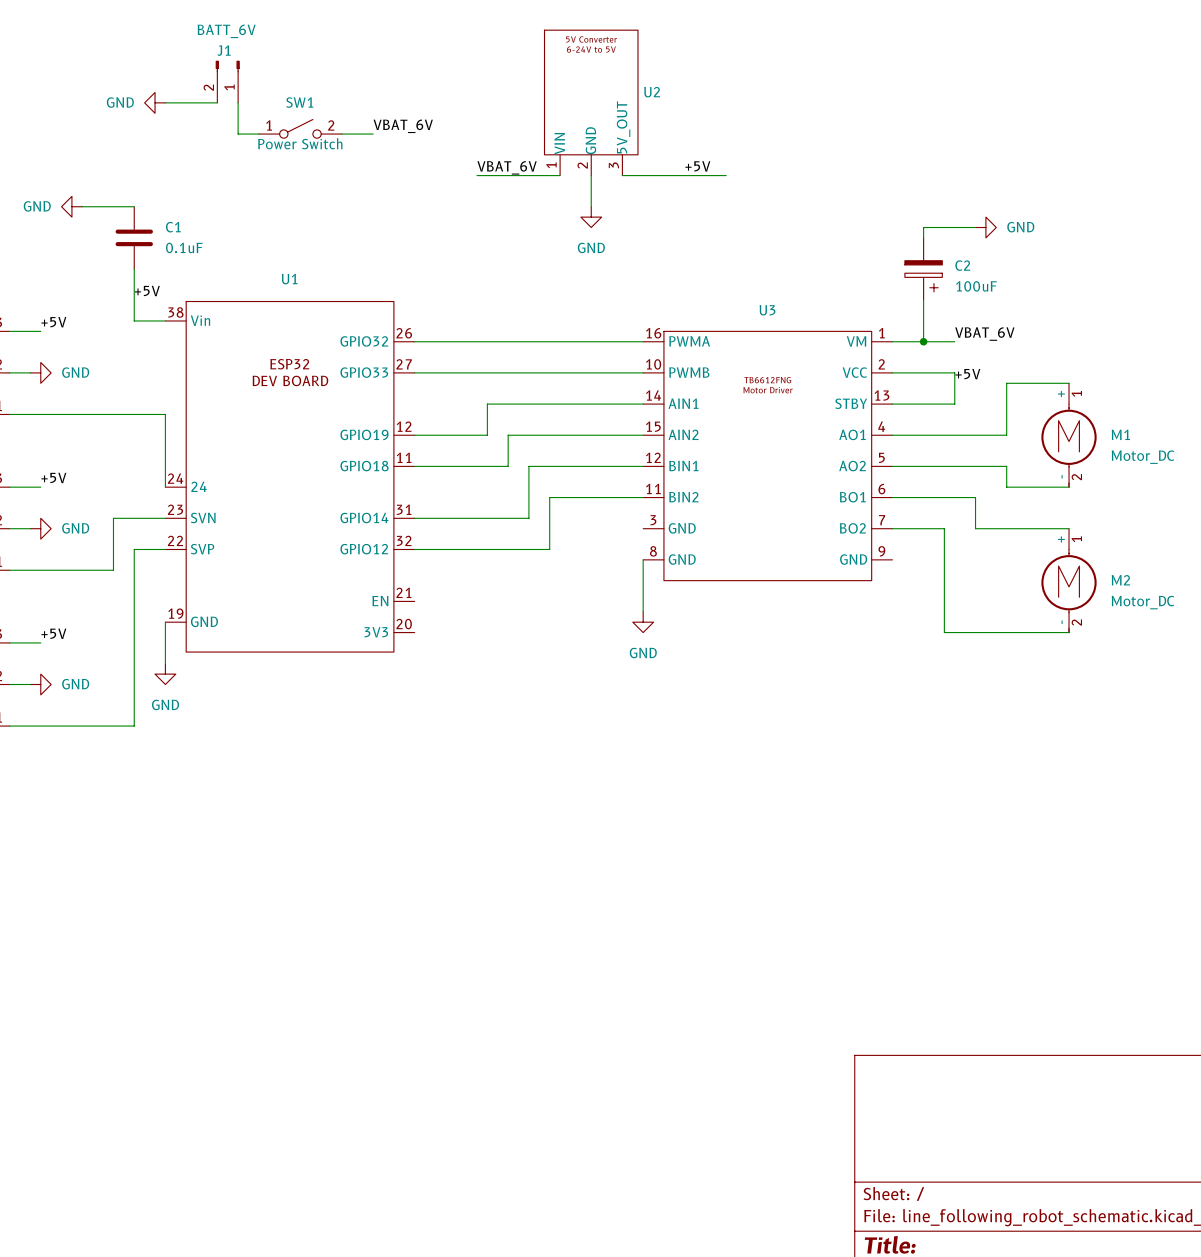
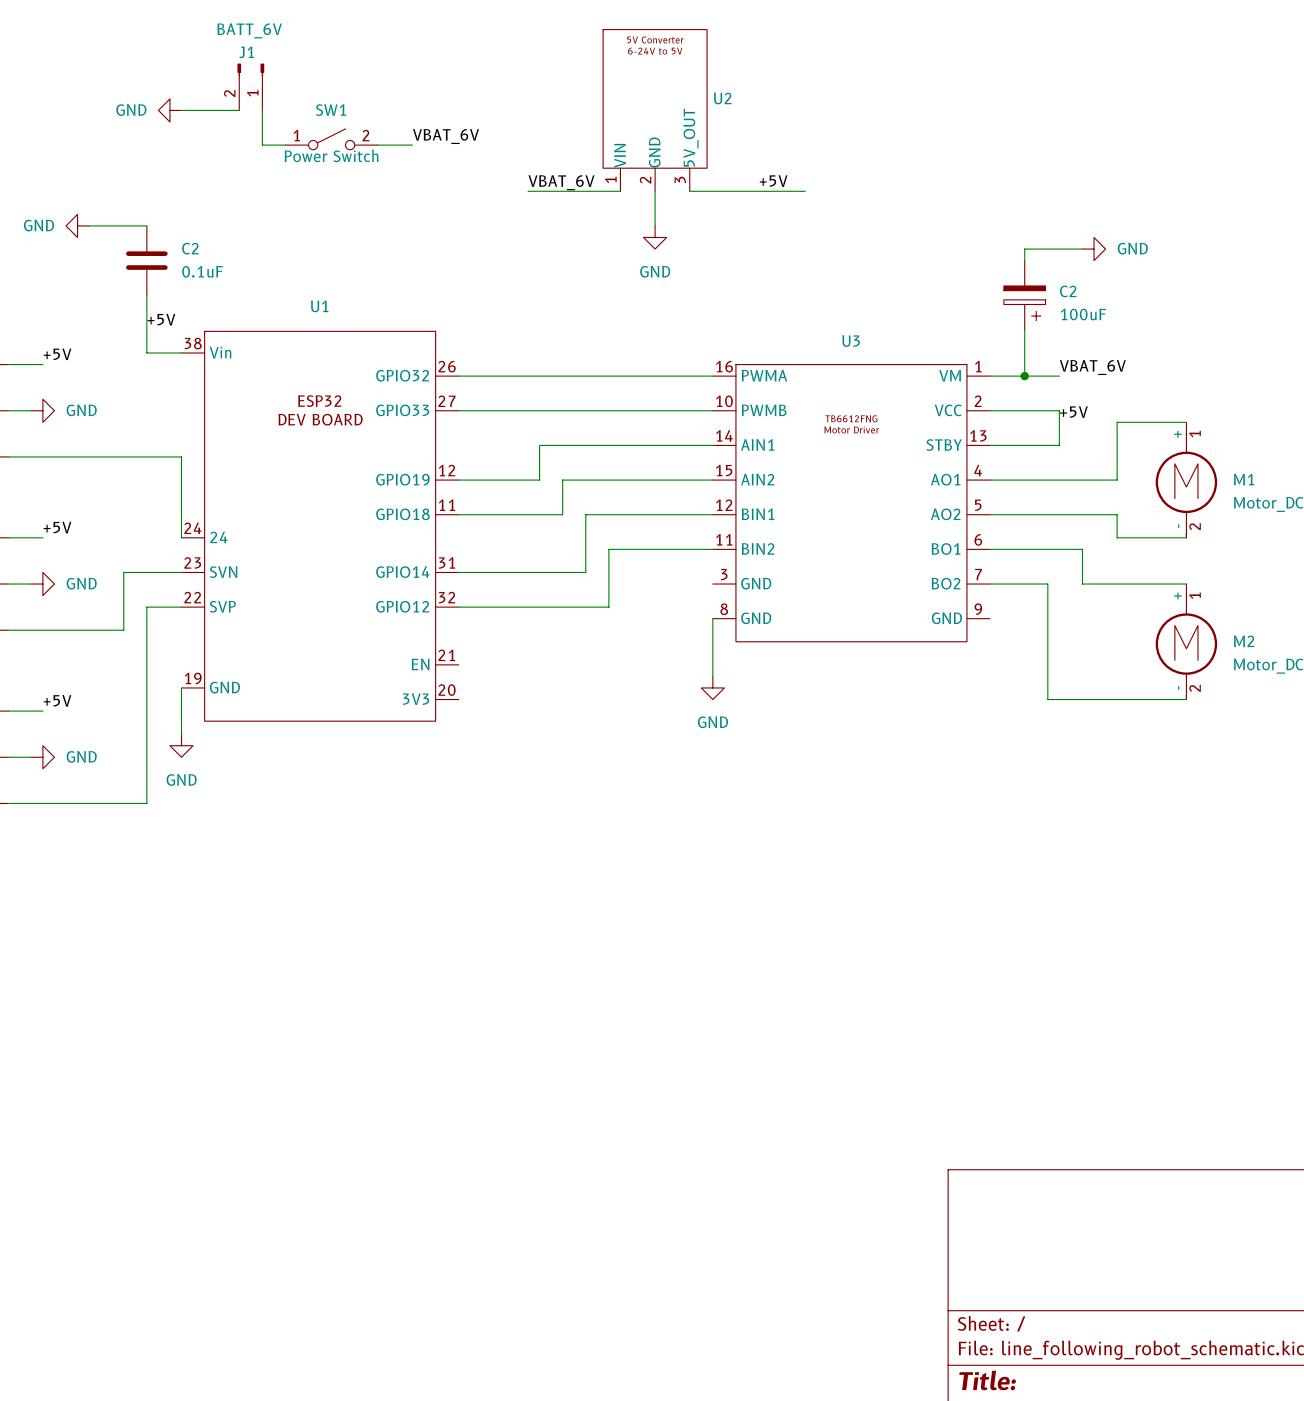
C1 name: C1 (173, 227) -> C2 (190, 248)

